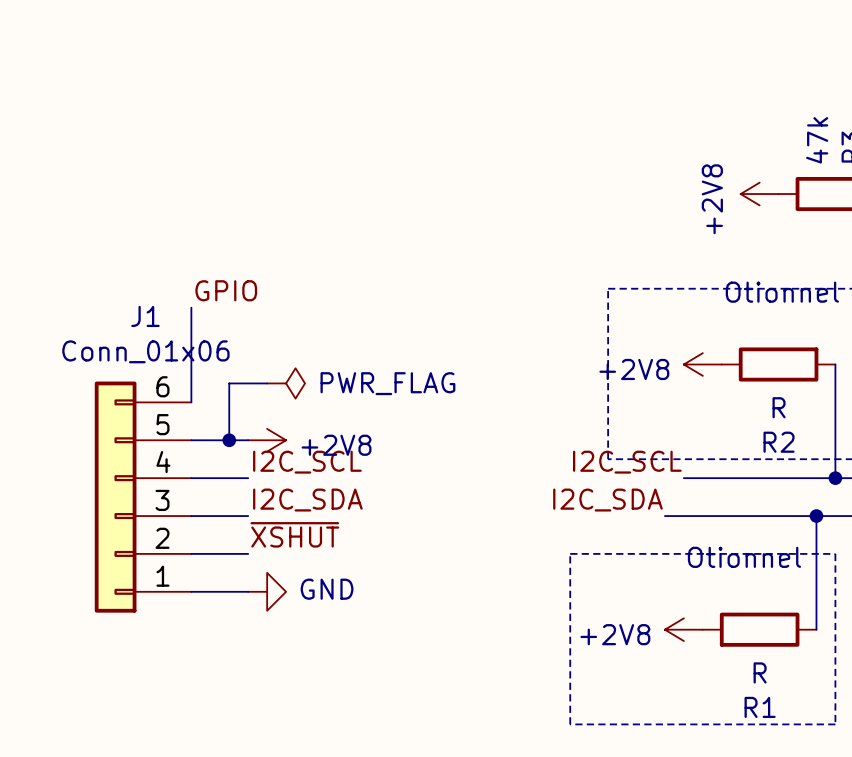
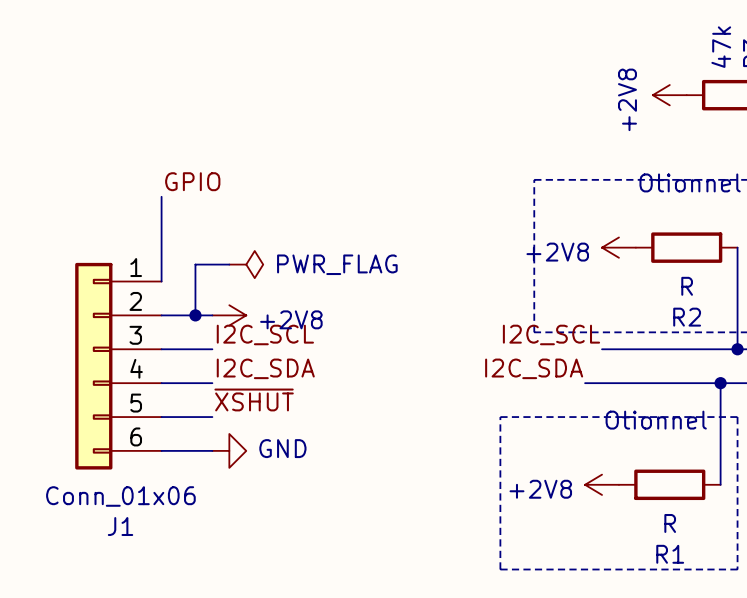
J1 flip: as is (115, 497) -> up-down (93, 366)

